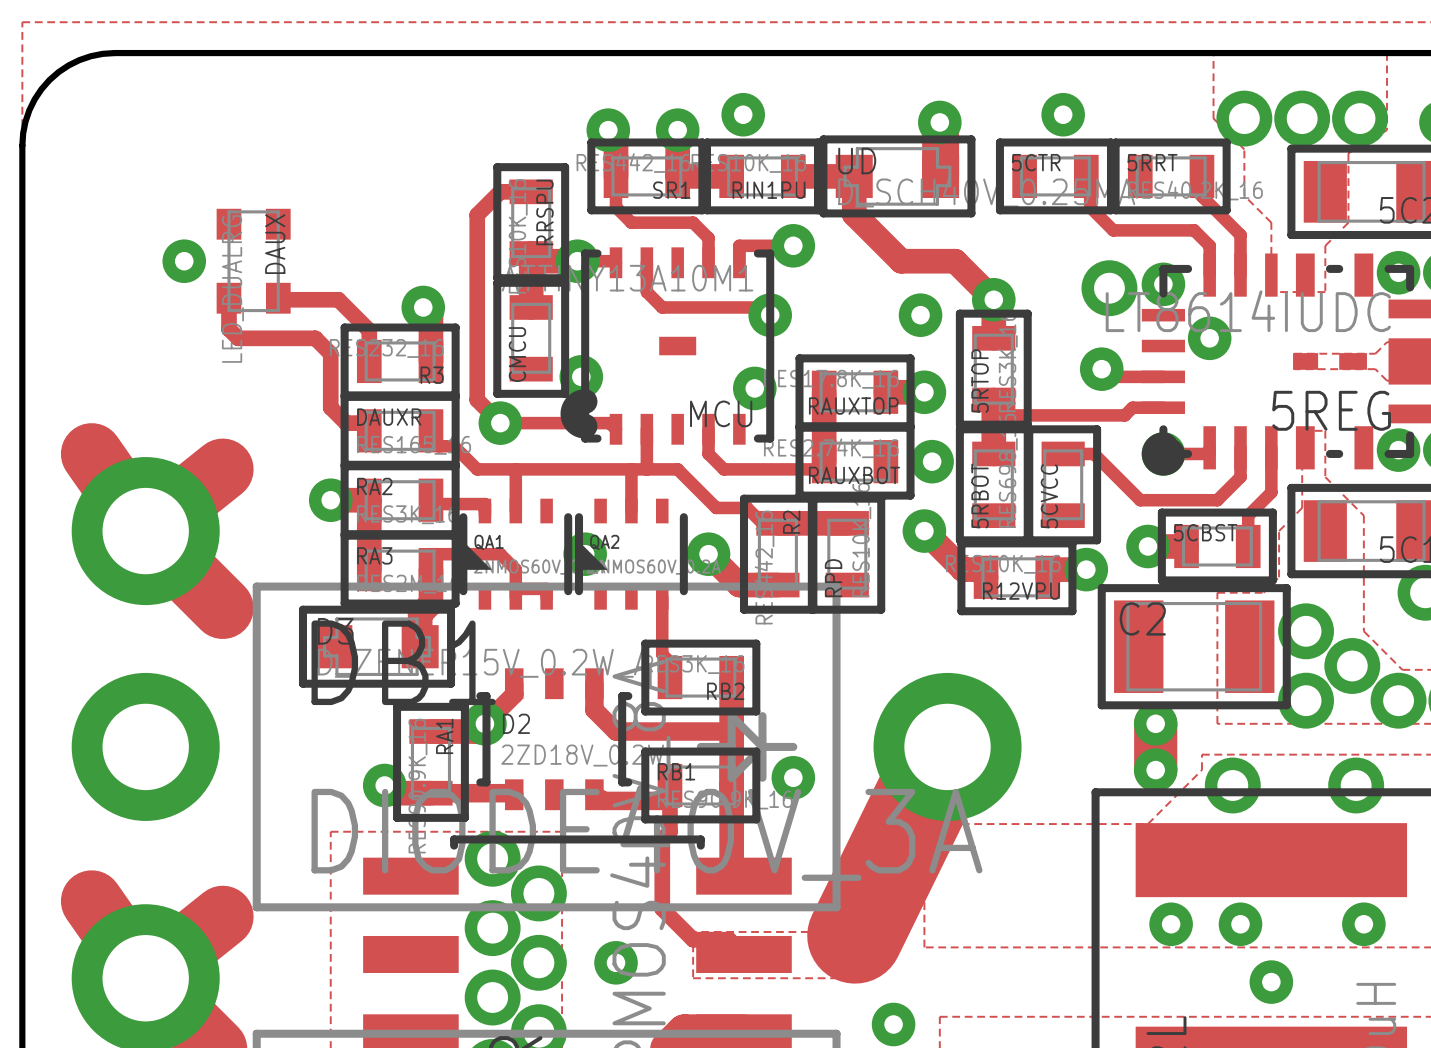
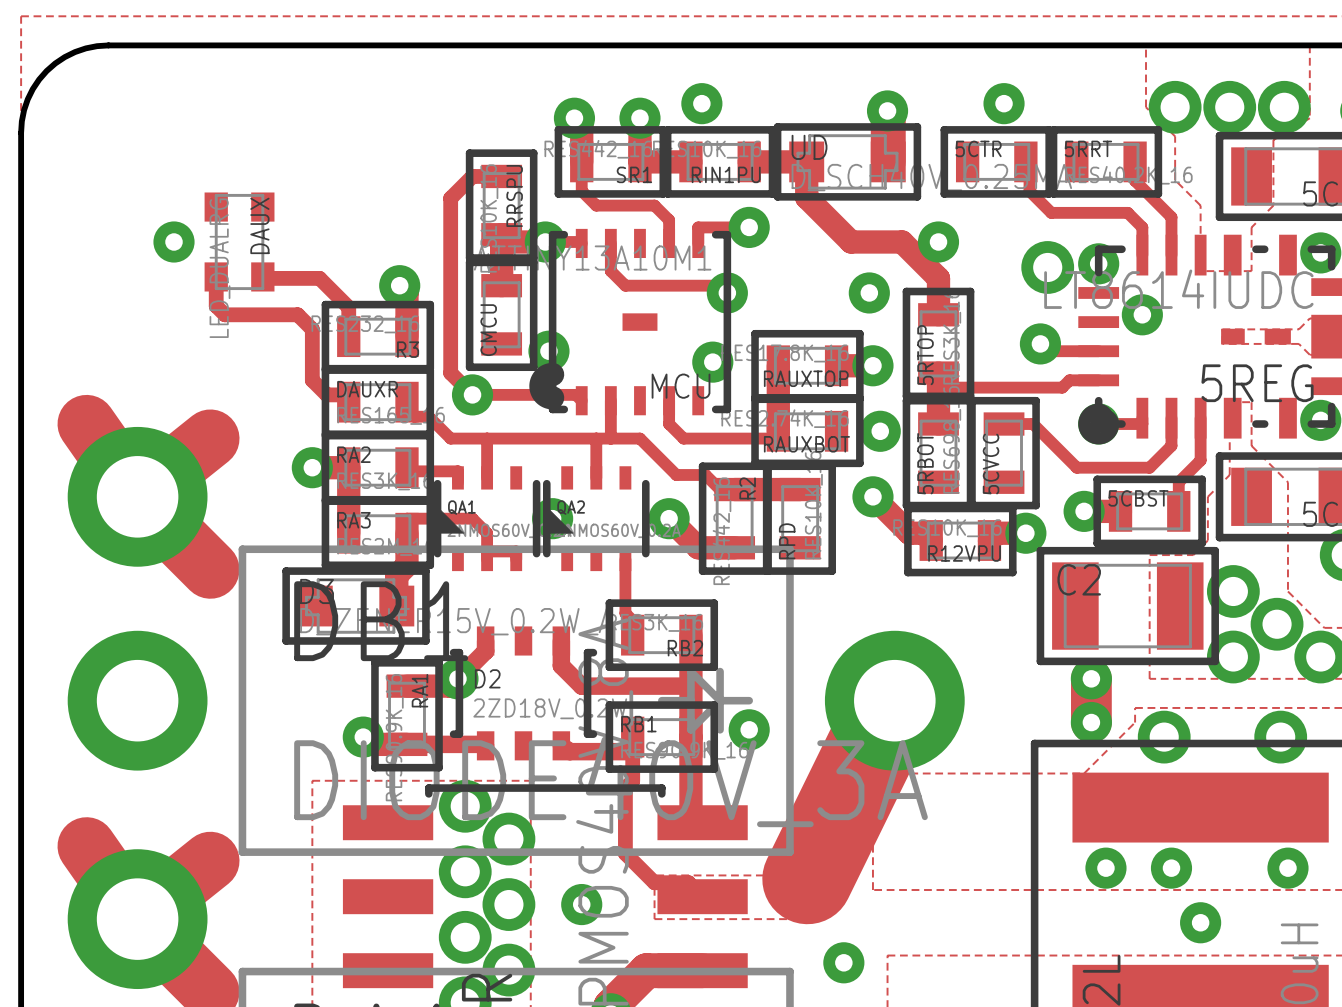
via position: (993, 299) -> (938, 241)

